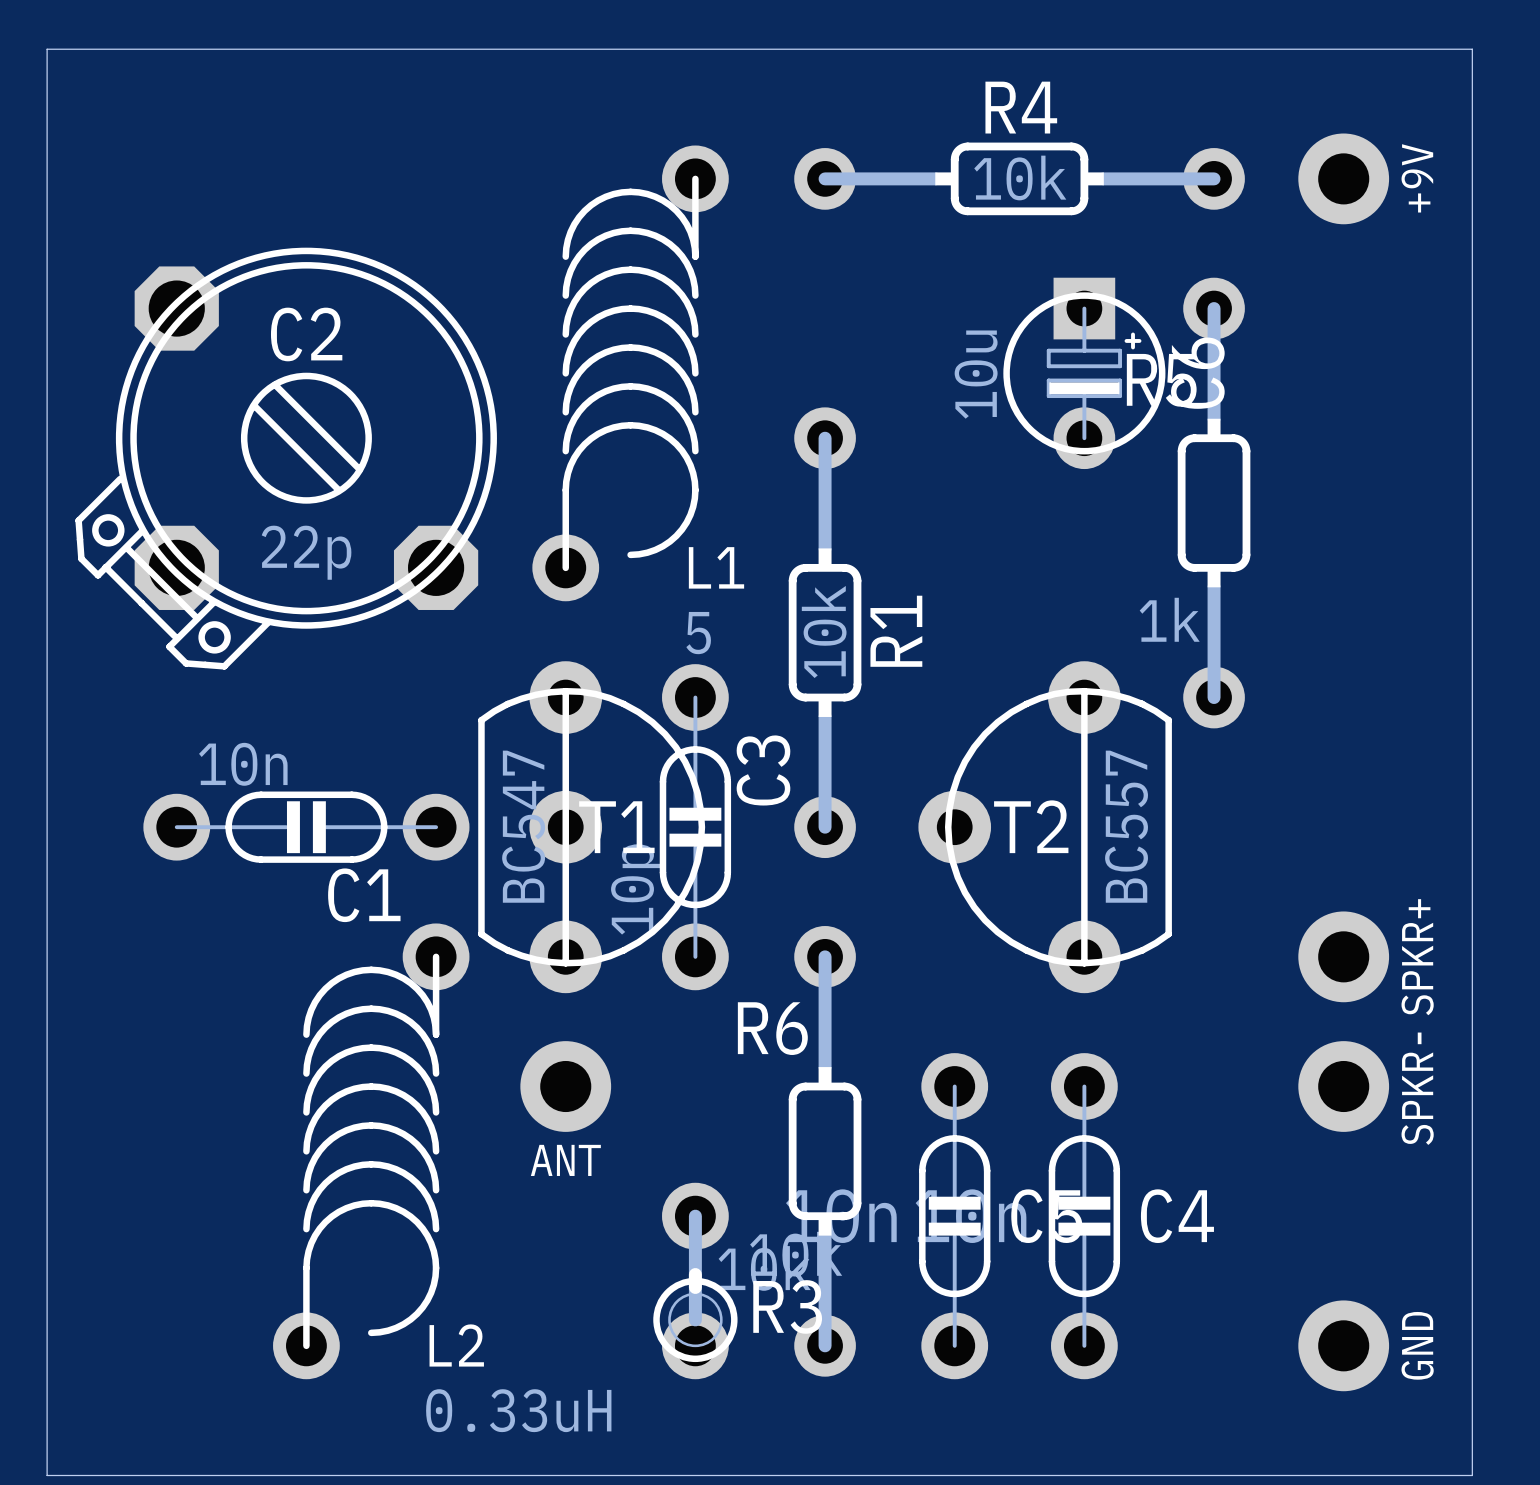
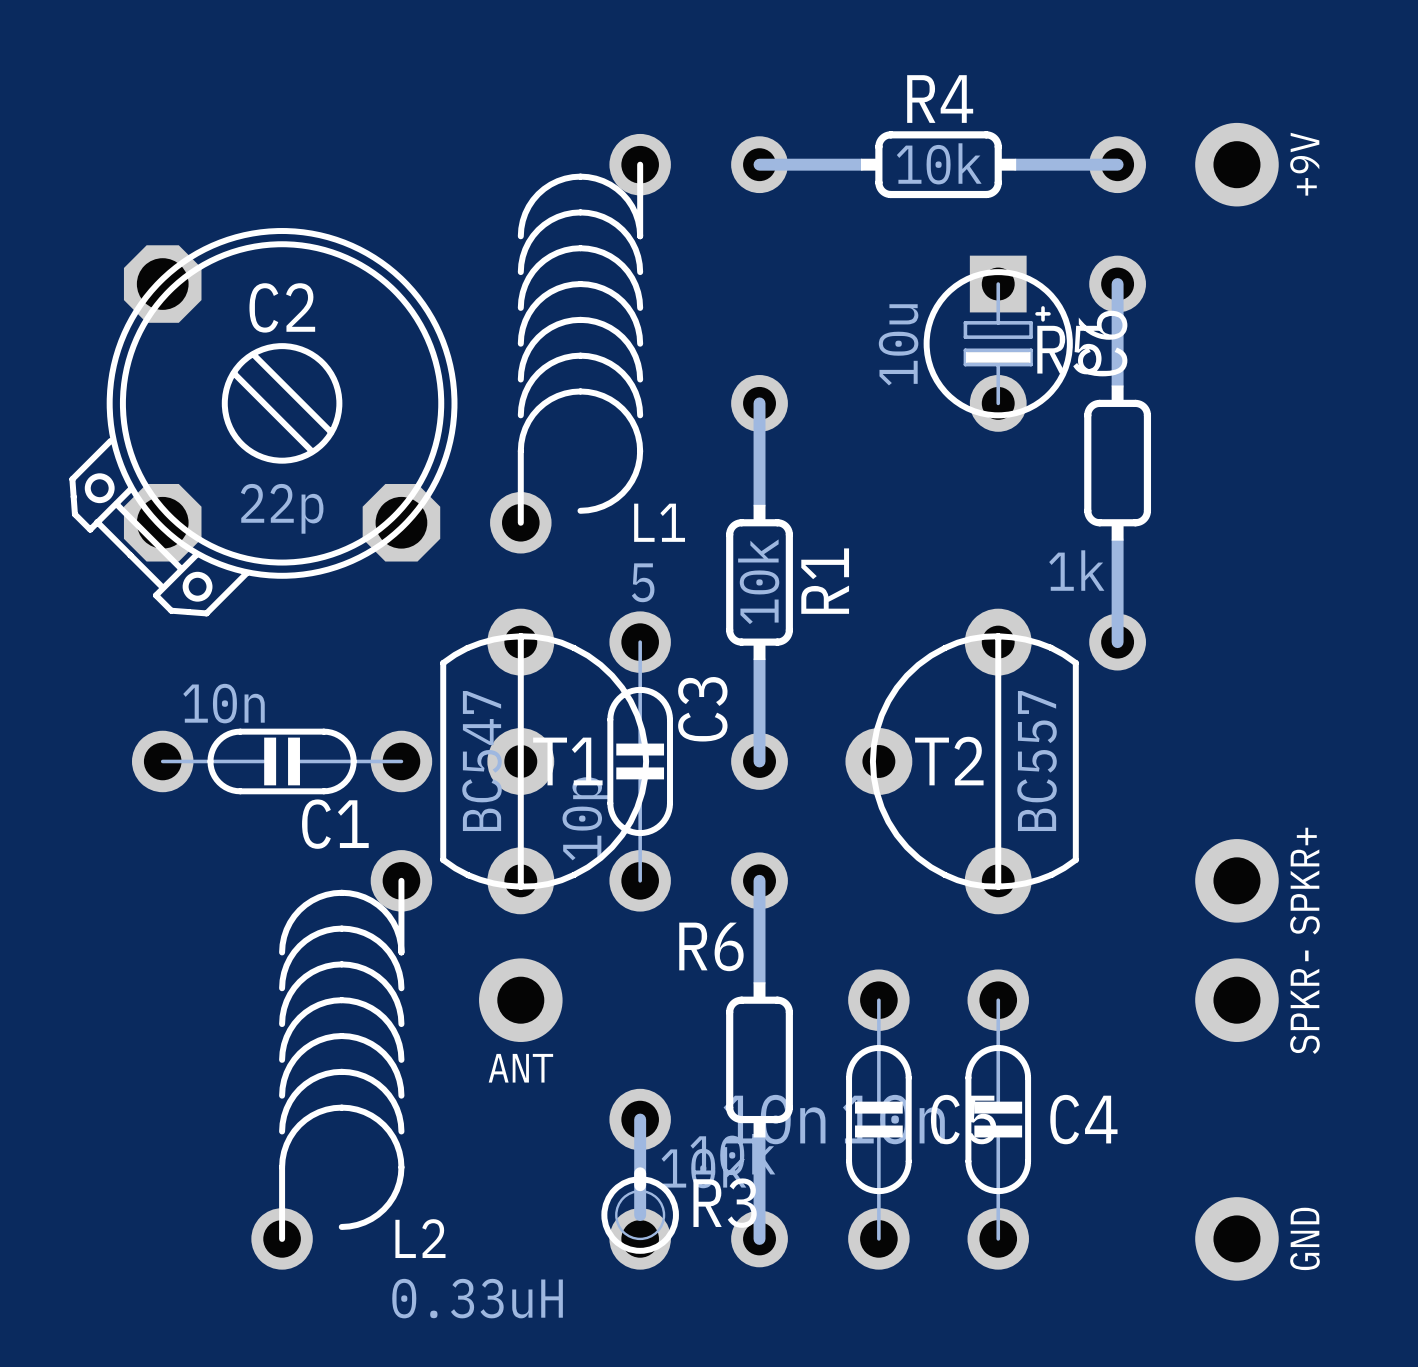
board edge: (47, 49) (1472, 49) (1472, 1475) (47, 1475) (47, 49) -> none

